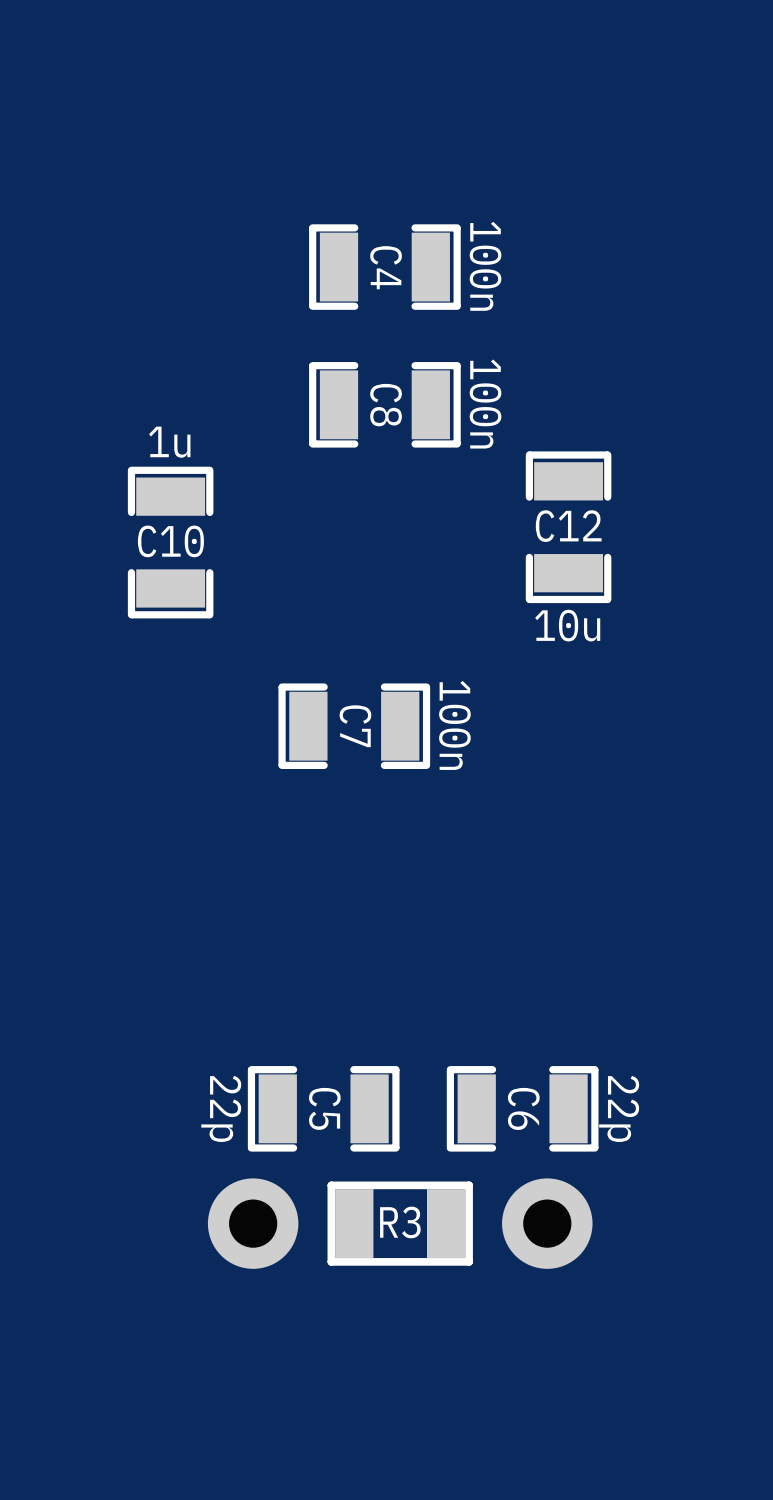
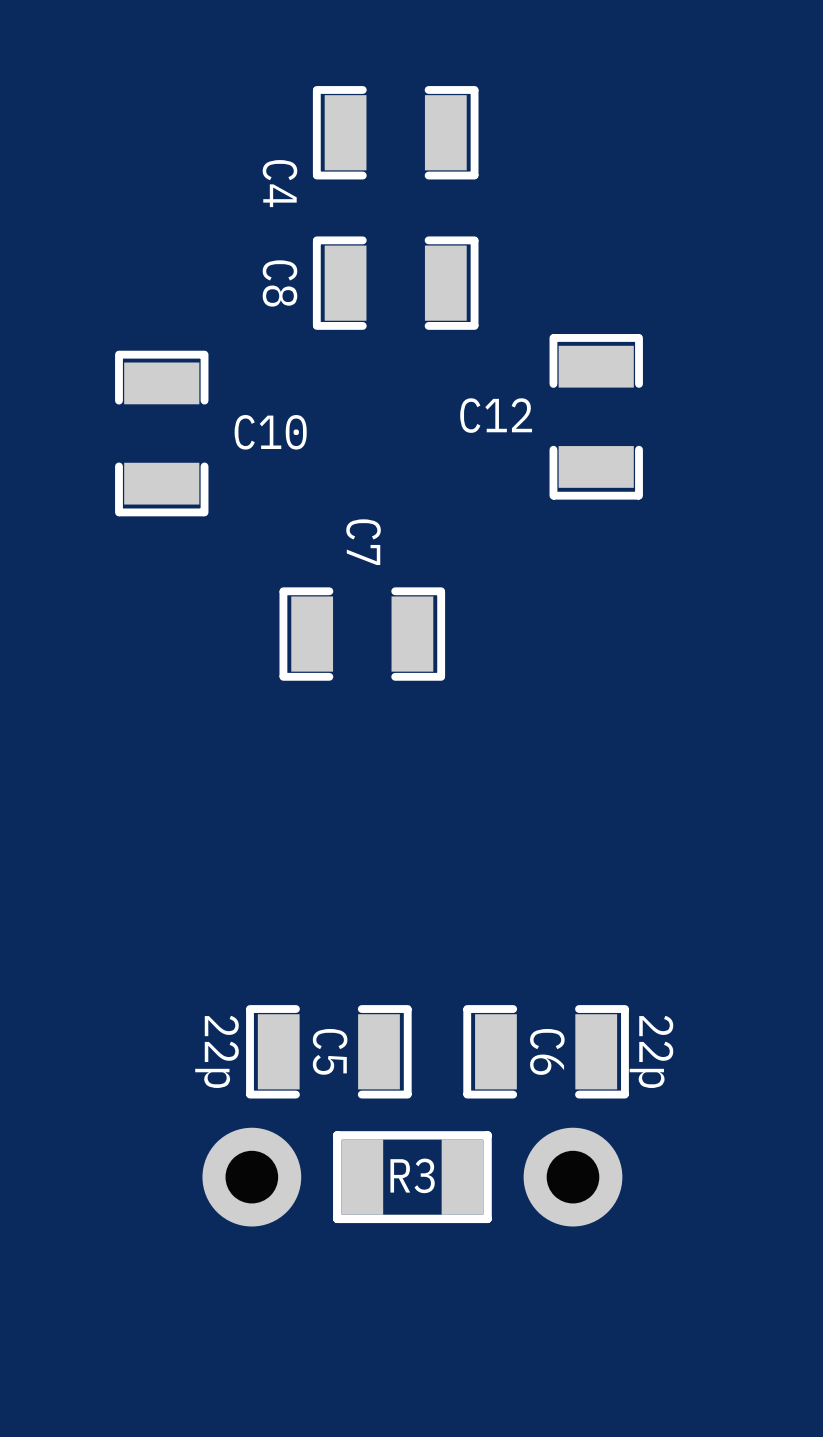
C4 value: 100n (485, 266) -> none
C4 name position: C4 (386, 267) -> C4 (279, 183)
C8 value: 100n (485, 404) -> none
C8 name position: C8 (386, 405) -> C8 (279, 283)
C10 value: 1u (169, 442) -> none
C12 name position: C12 (568, 526) -> C12 (496, 415)
C10 name position: C10 (170, 541) -> C10 (270, 432)
C12 value: 10u (567, 625) -> none
C7 value: 100n (454, 725) -> none
C7 name position: C7 (355, 726) -> C7 (363, 542)

